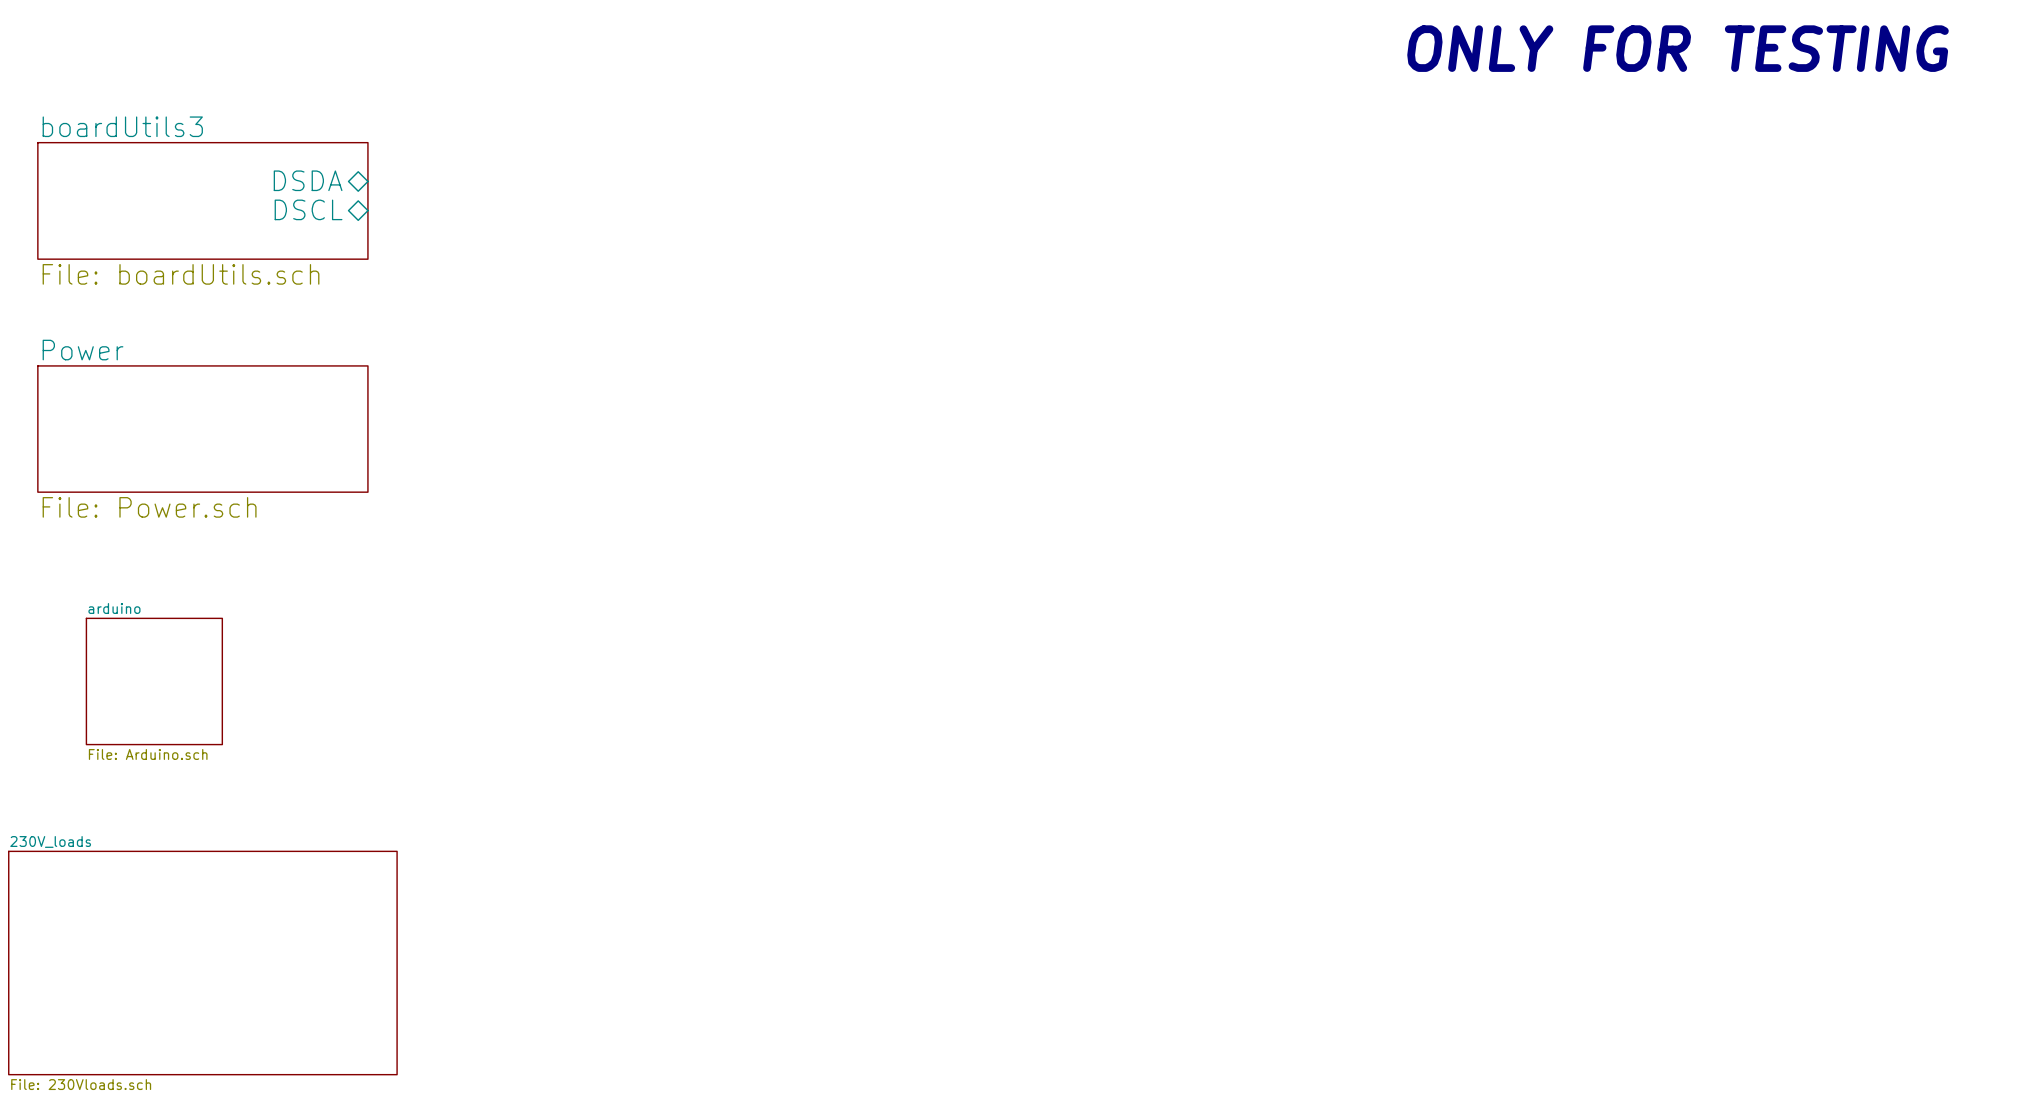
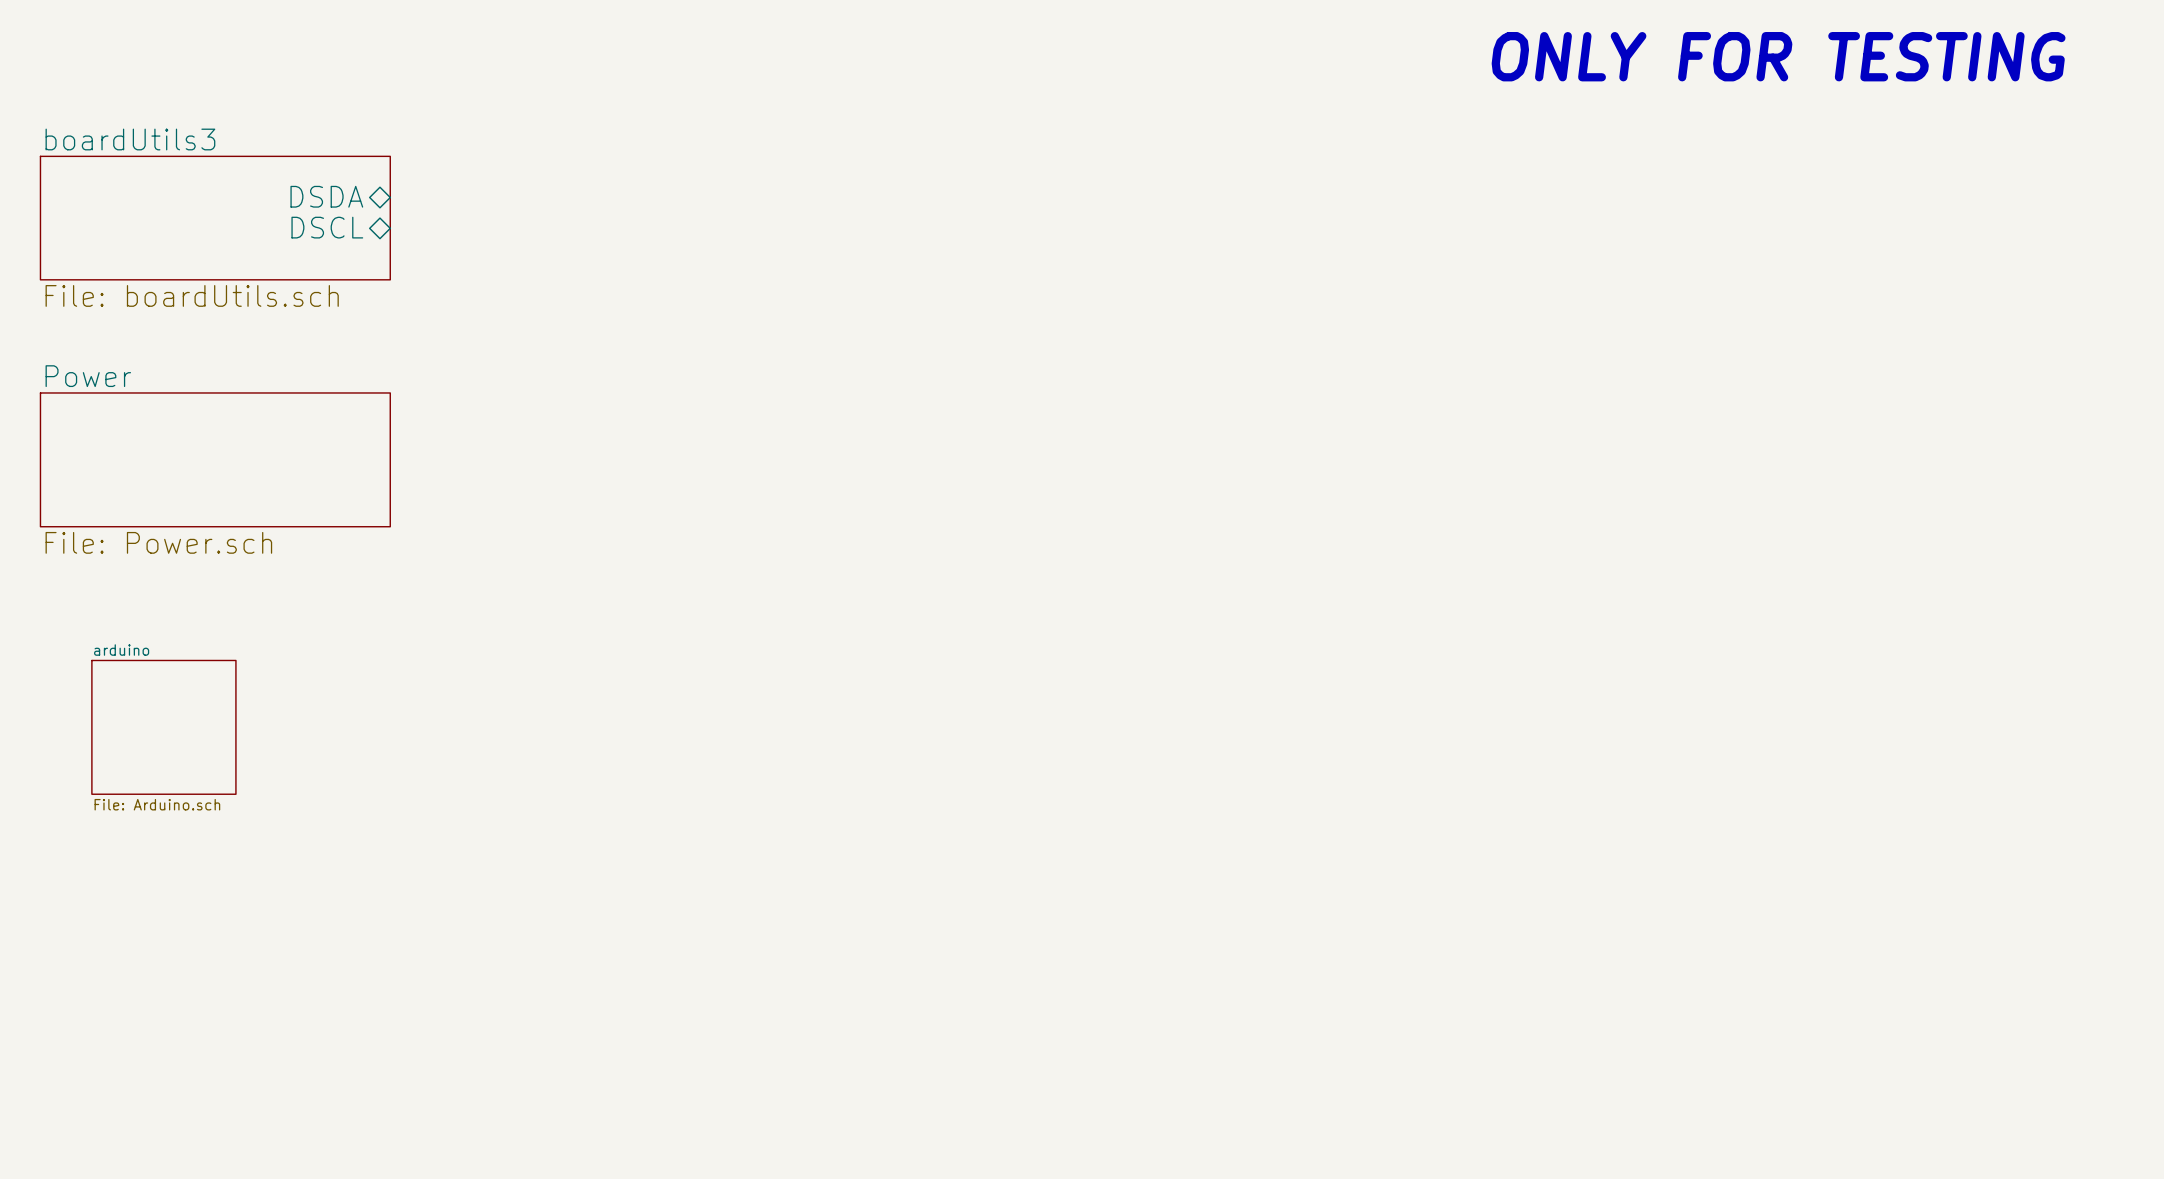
sheet 230V_loads: File: 230Vloads.sch (202, 963) -> none

